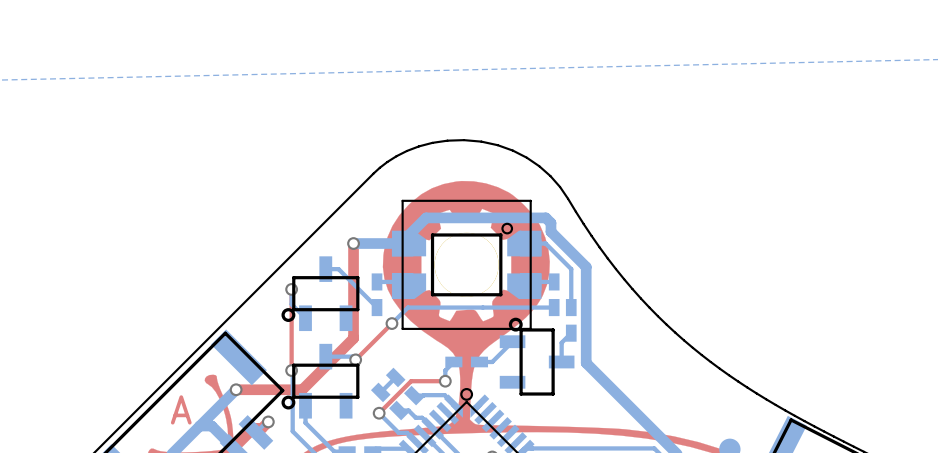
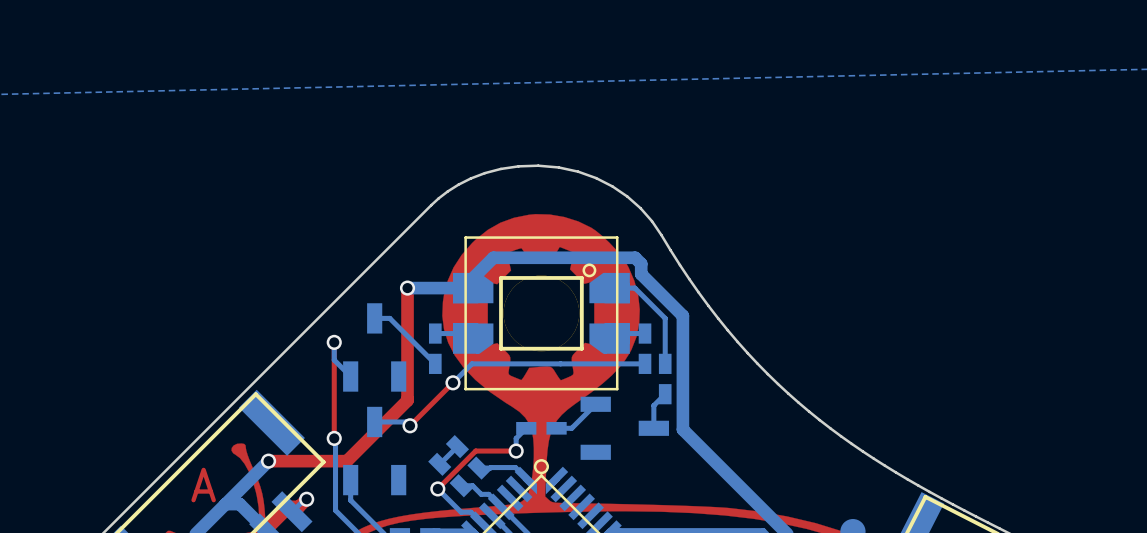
part footprint: [281, 256, 360, 332] -> [343, 303, 407, 392]
part footprint: [499, 317, 575, 396] -> [580, 396, 670, 460]
part footprint: [281, 343, 360, 419] -> [343, 406, 407, 496]

